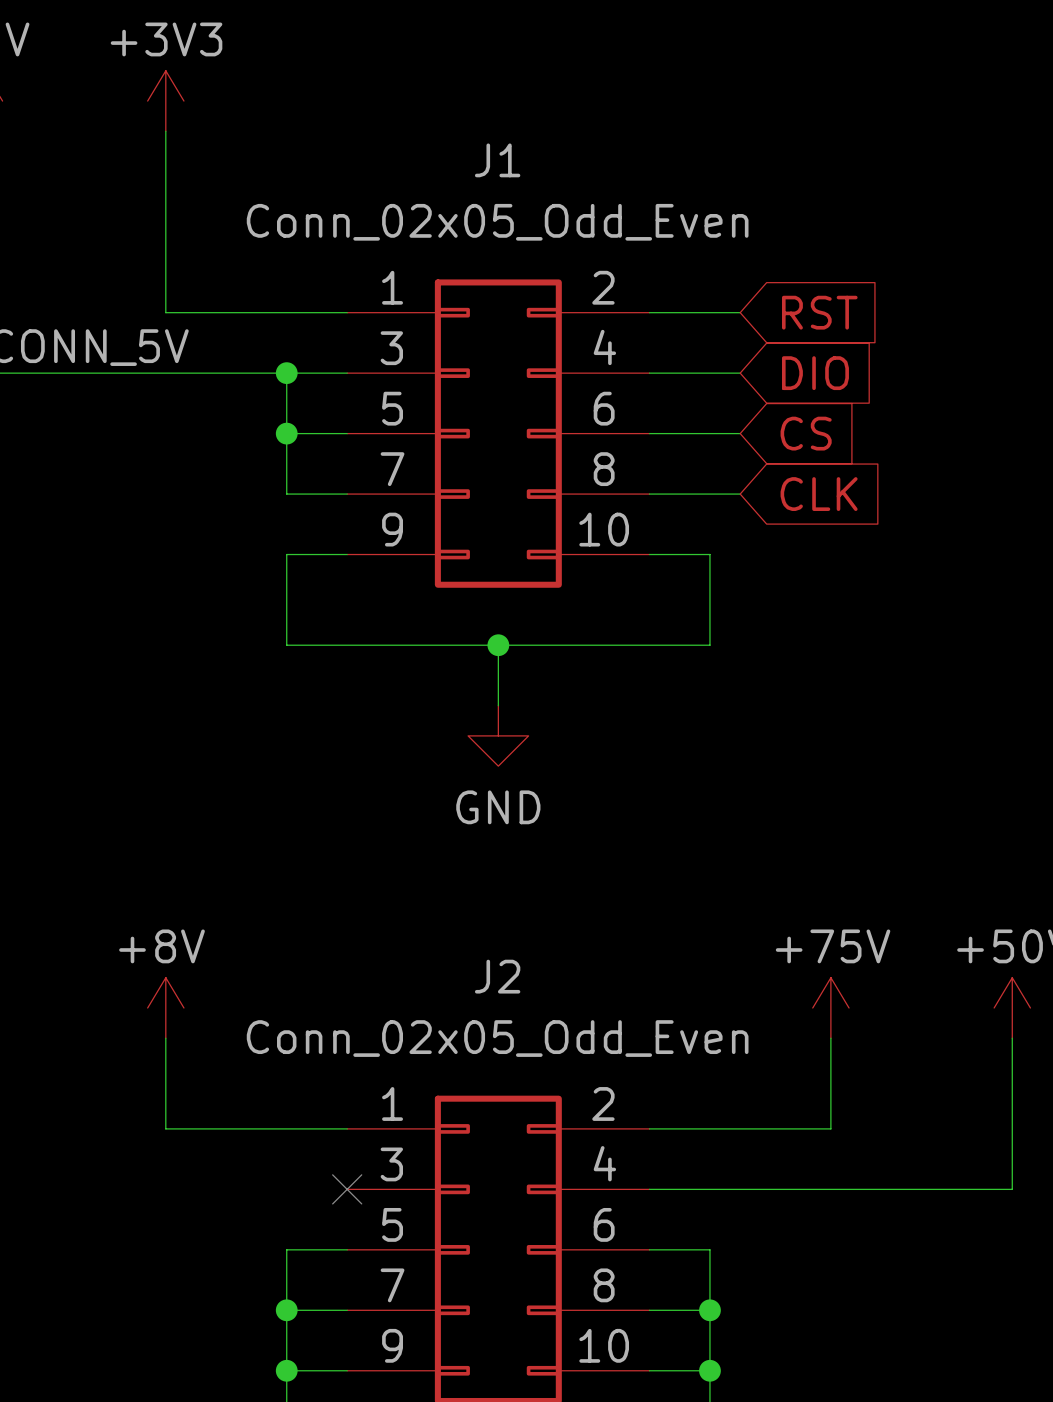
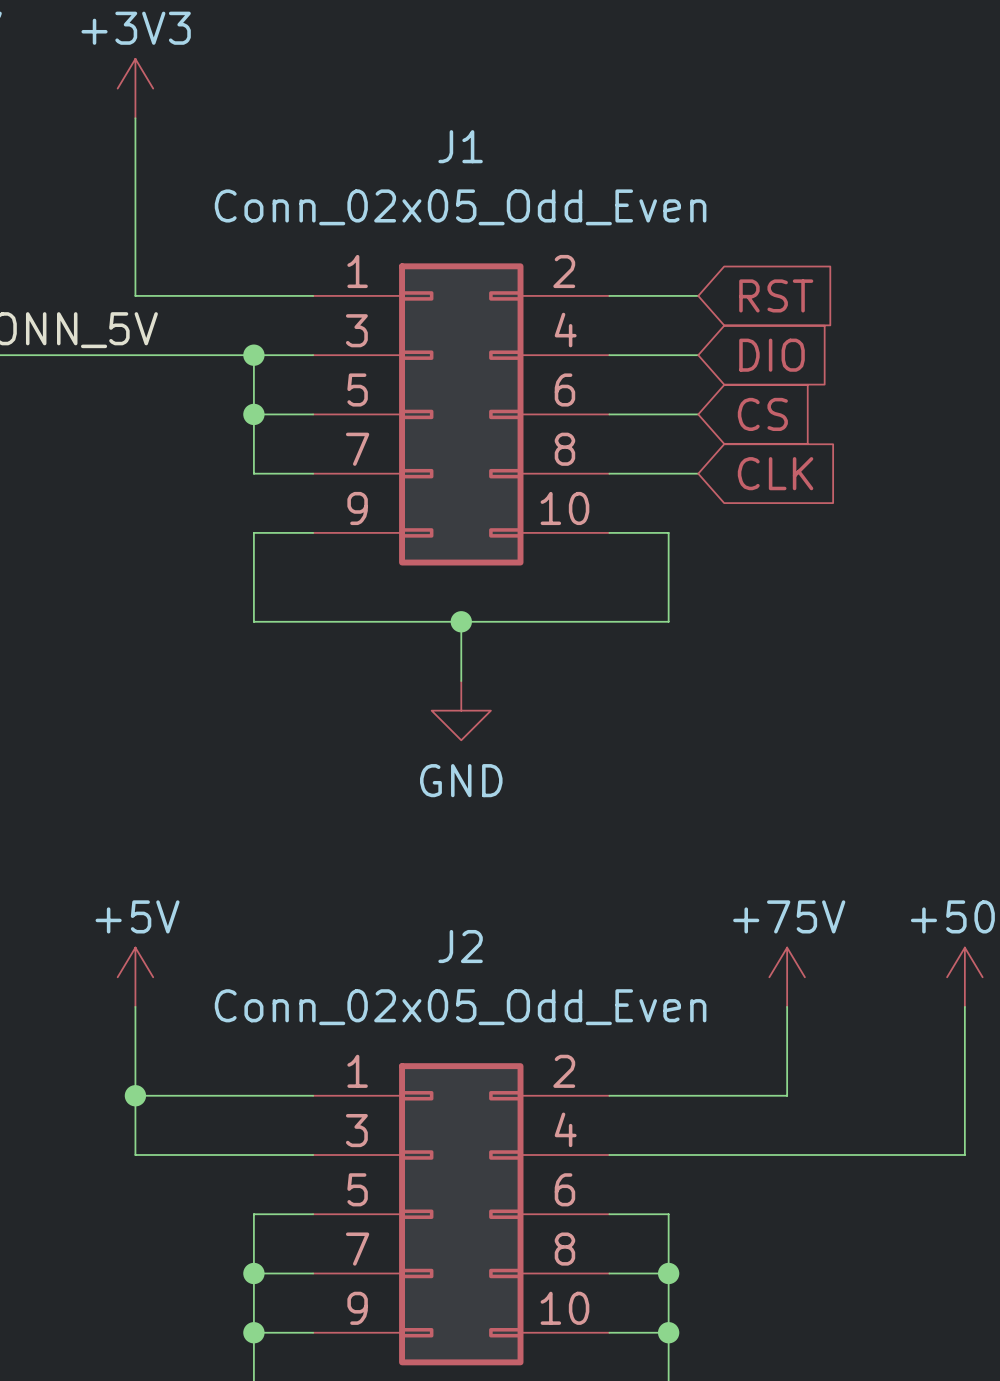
power symbol: +8V (165, 1007) -> +5V (135, 977)
wire: none -> (135, 1095) (135, 1155) (313, 1155)
junction: none -> (135, 1095)
no-connect mark: (347, 1189) -> none

